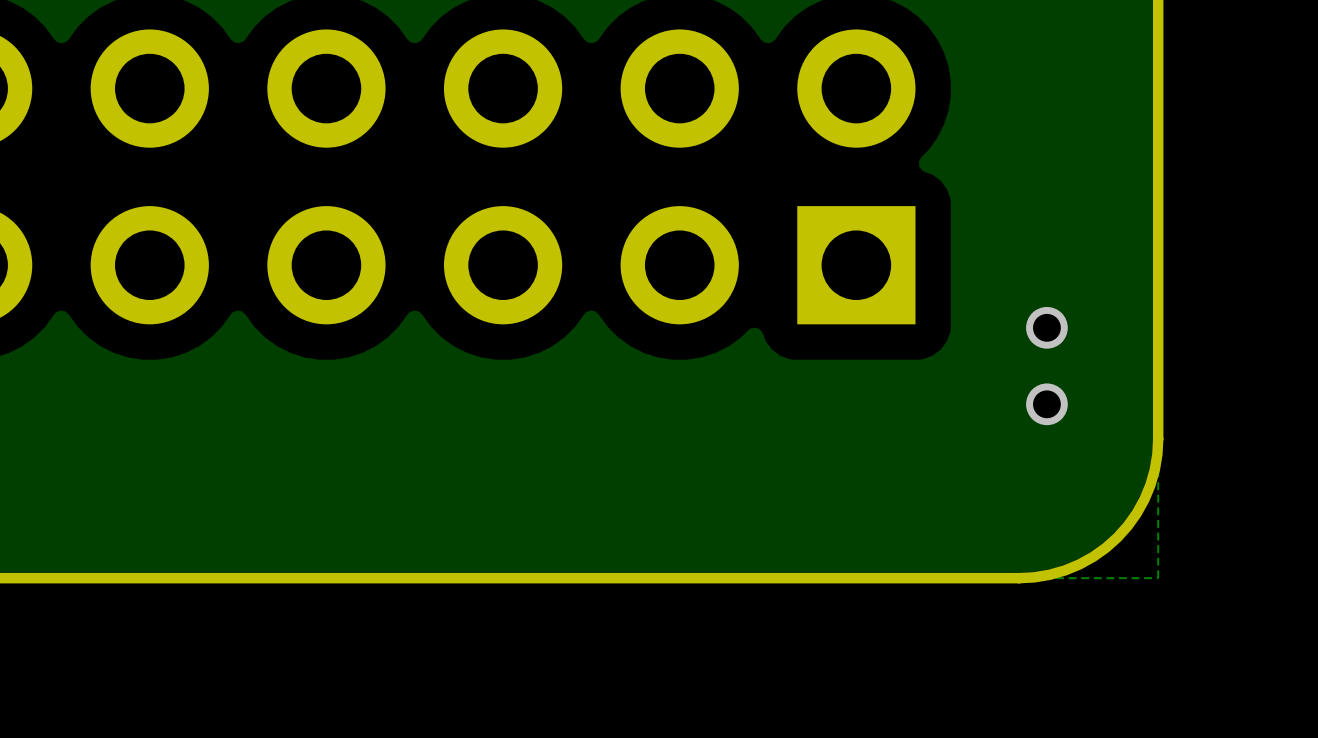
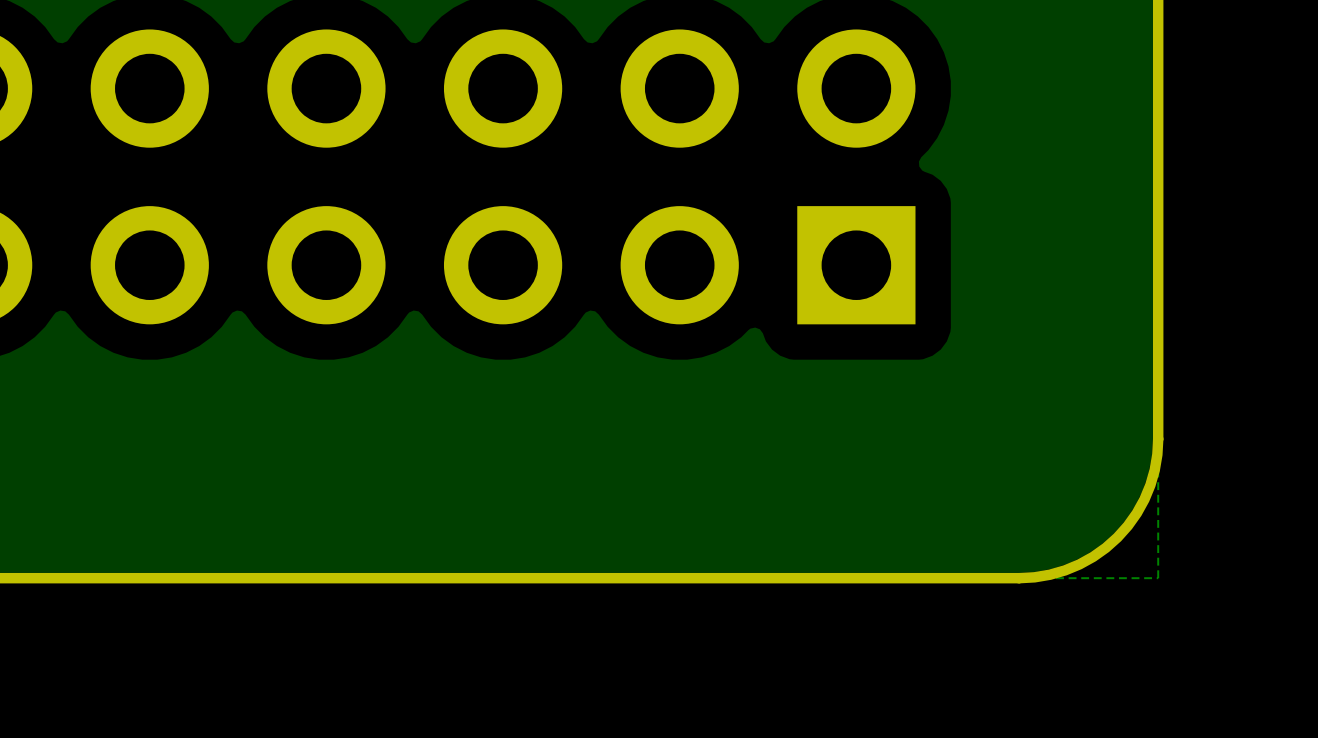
via: (1046, 327) -> none
via: (1046, 404) -> none

